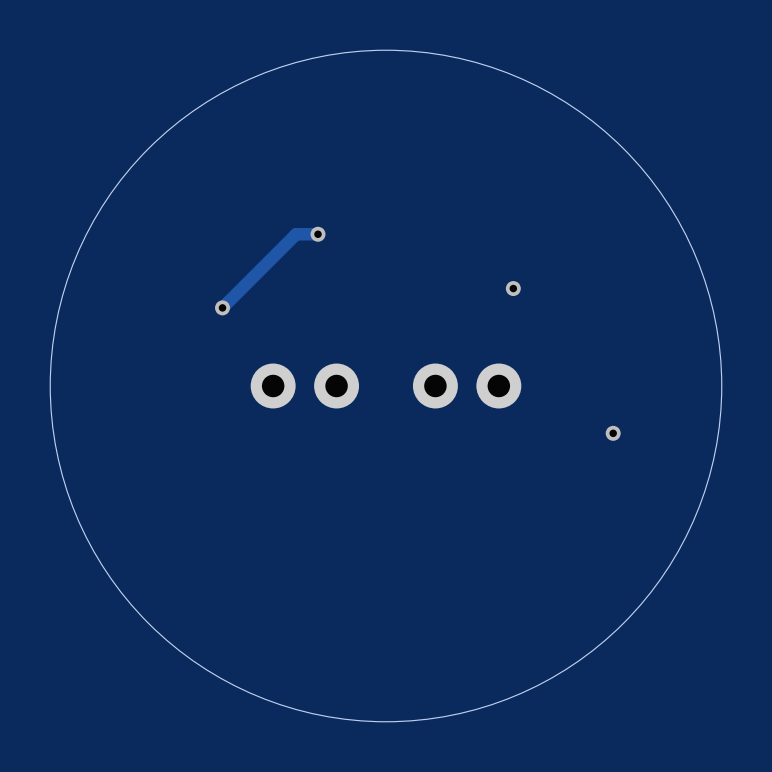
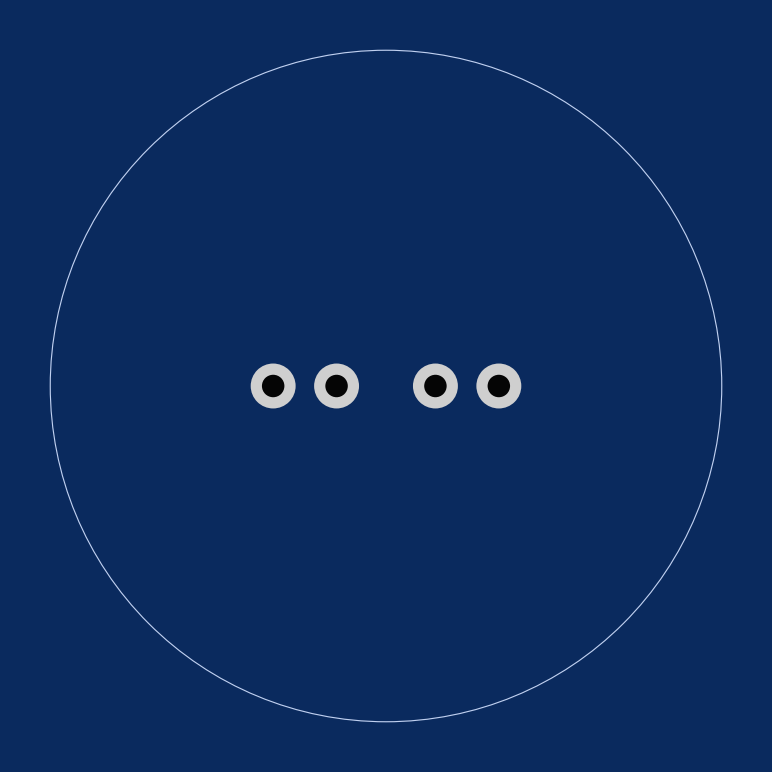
track: (318, 234) (296, 234) (222, 307) -> none
via: (318, 234) -> none
via: (513, 288) -> none
via: (222, 307) -> none
via: (613, 433) -> none

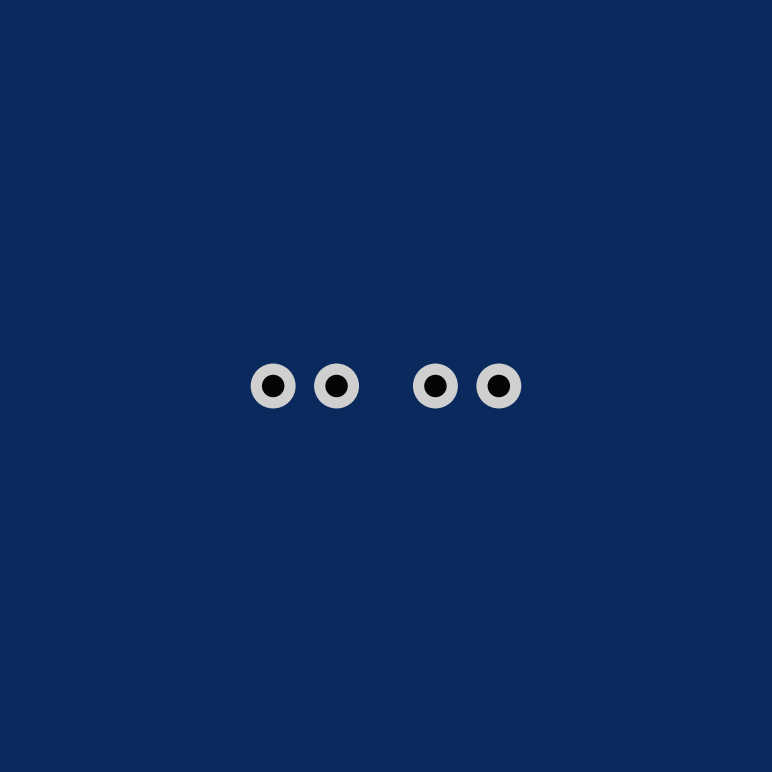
round board edge: [49, 49, 723, 723] -> none

